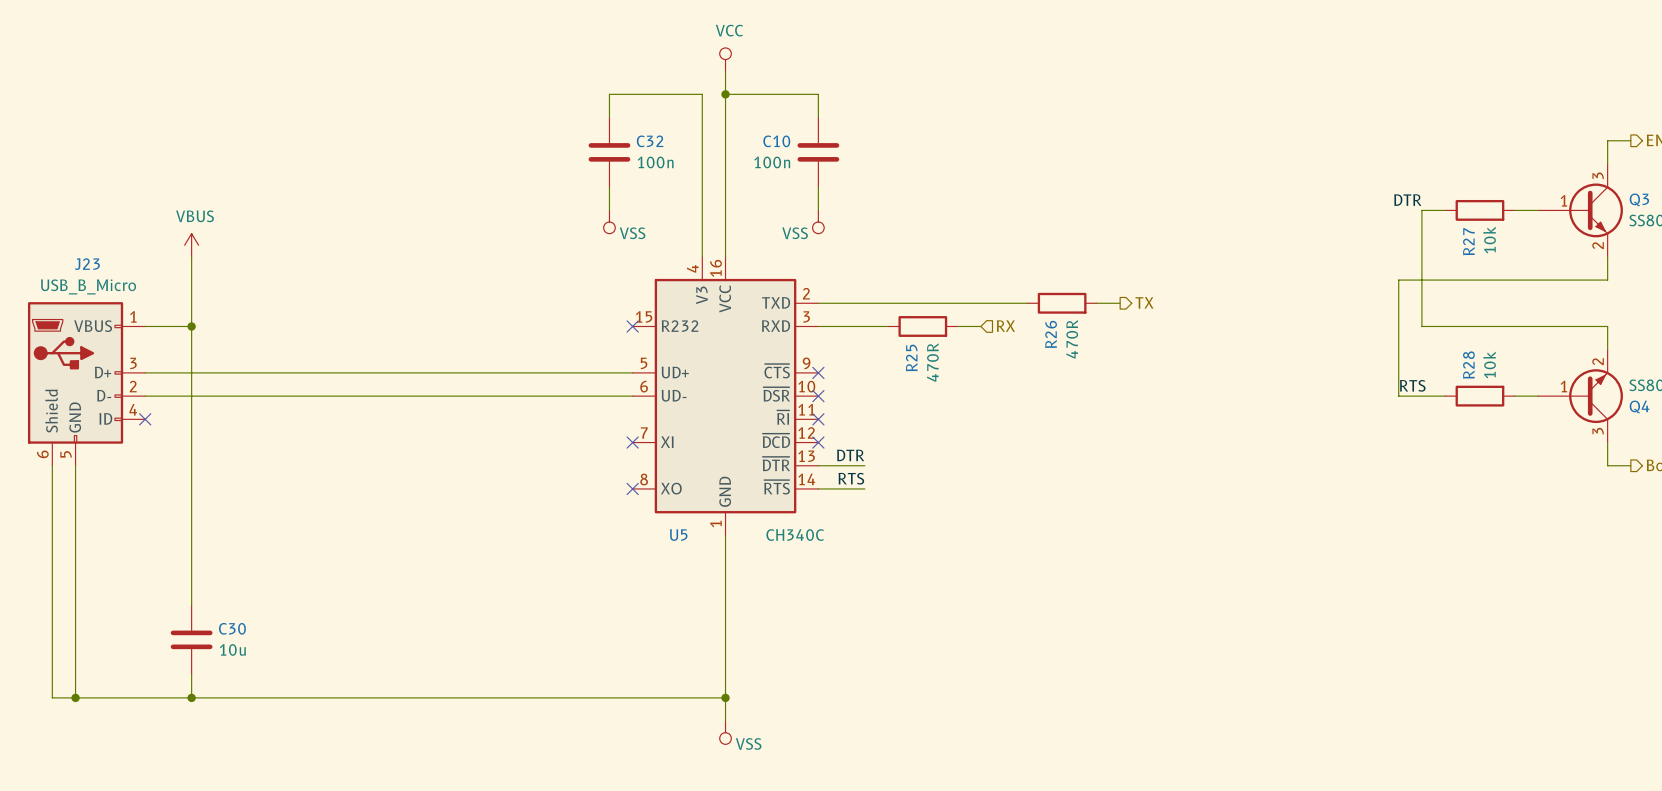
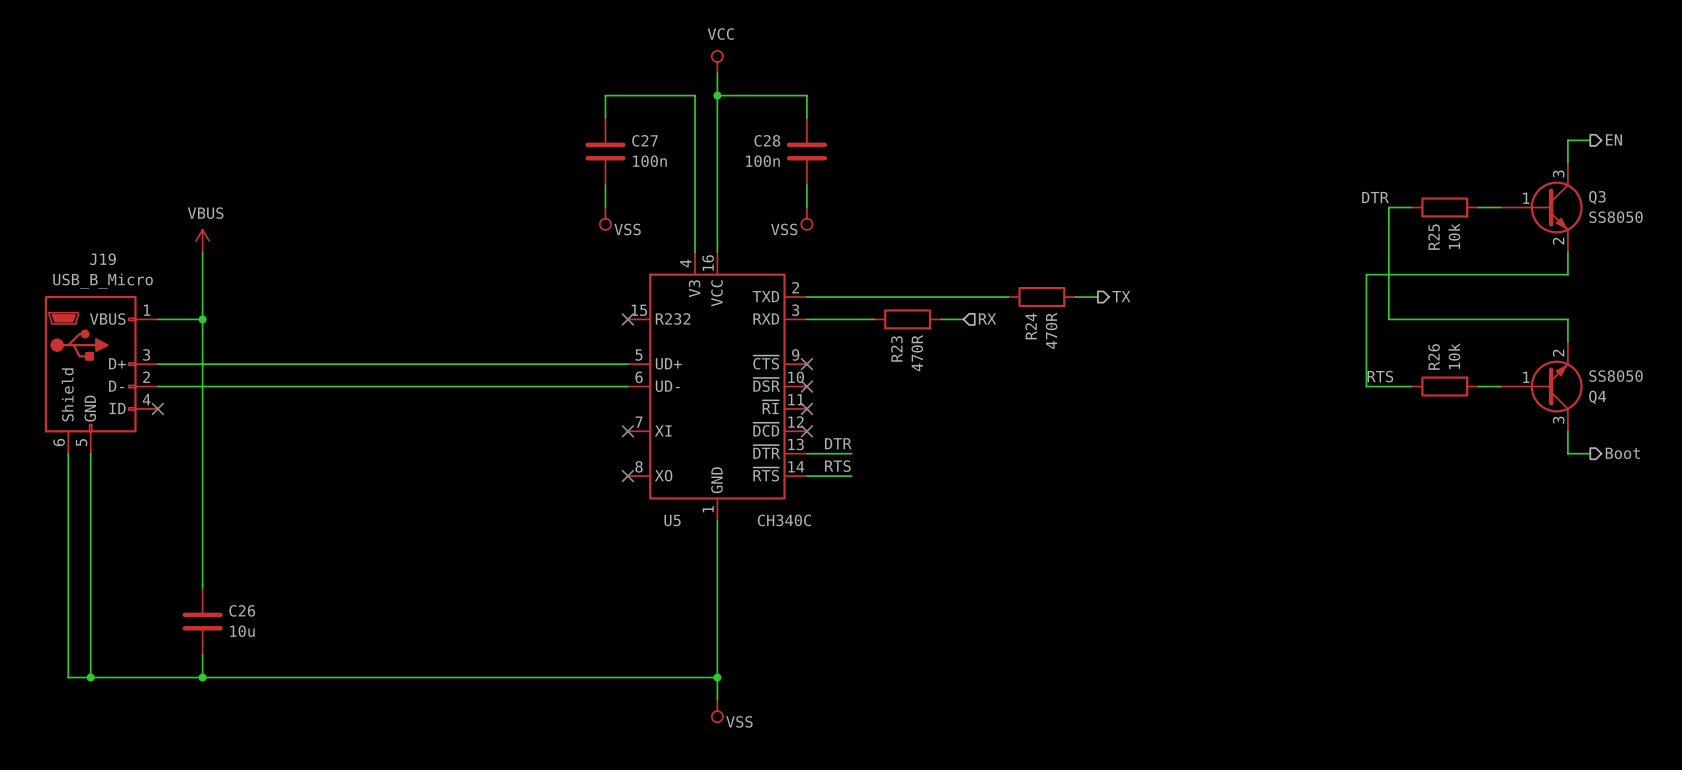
C32 name: C32 (650, 141) -> C27 (645, 140)
C10 name: C10 (776, 141) -> C28 (767, 140)
R27 name: R27 (1468, 241) -> R25 (1434, 237)
J23 name: J23 (87, 264) -> J19 (102, 259)
R26 name: R26 (1051, 334) -> R24 (1031, 326)
R25 name: R25 (911, 357) -> R23 (896, 348)
R28 name: R28 (1468, 365) -> R26 (1434, 356)
C30 name: C30 (232, 628) -> C26 (242, 610)

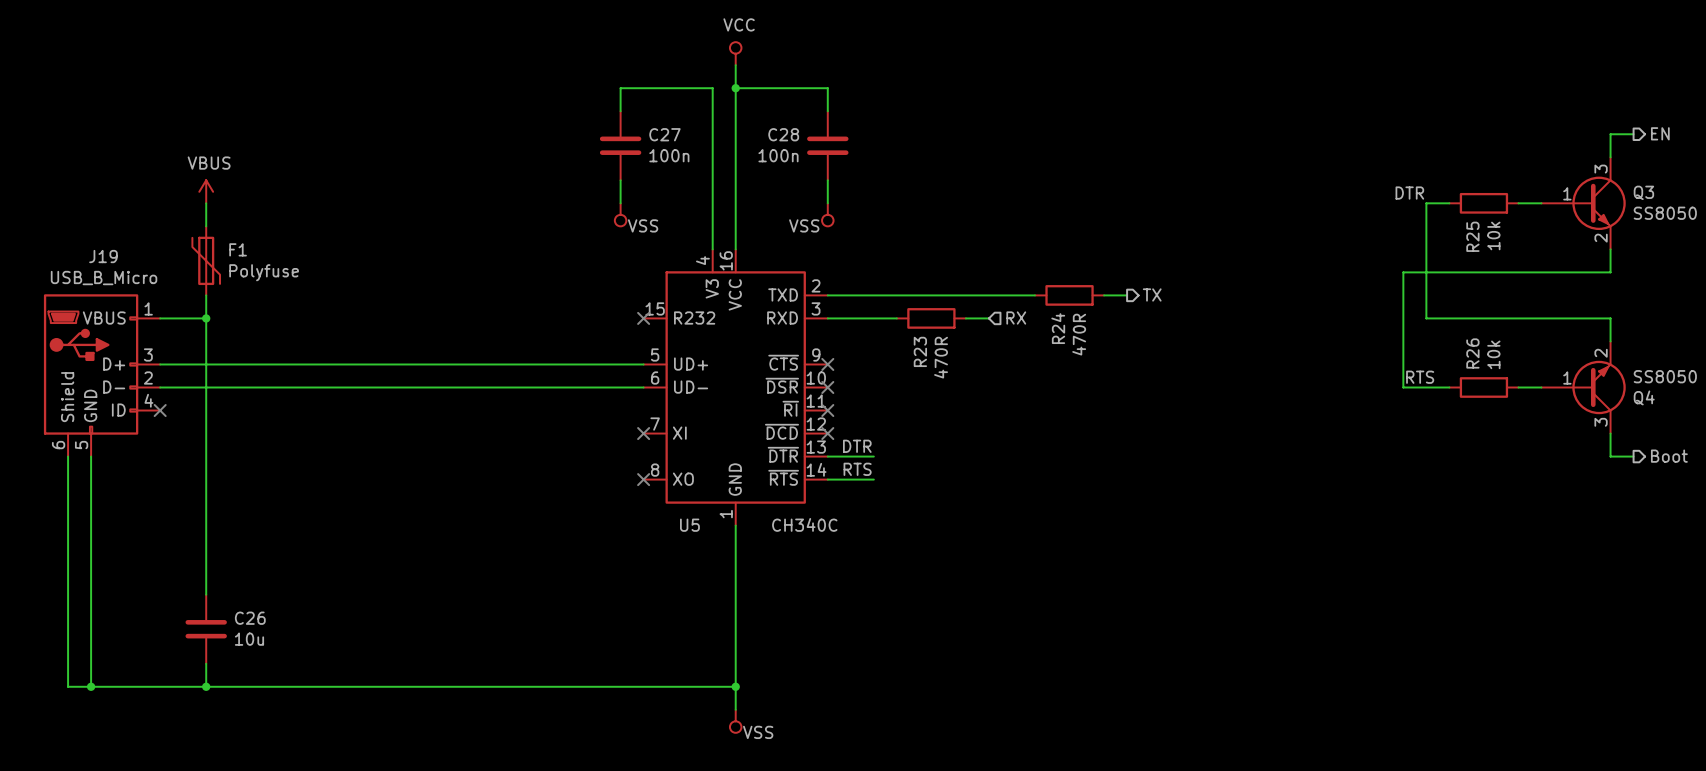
wire: none -> (206, 203) (206, 226)
power symbol position: VBUS (202, 241) -> VBUS (206, 191)
F1: none -> Polyfuse (206, 260)

